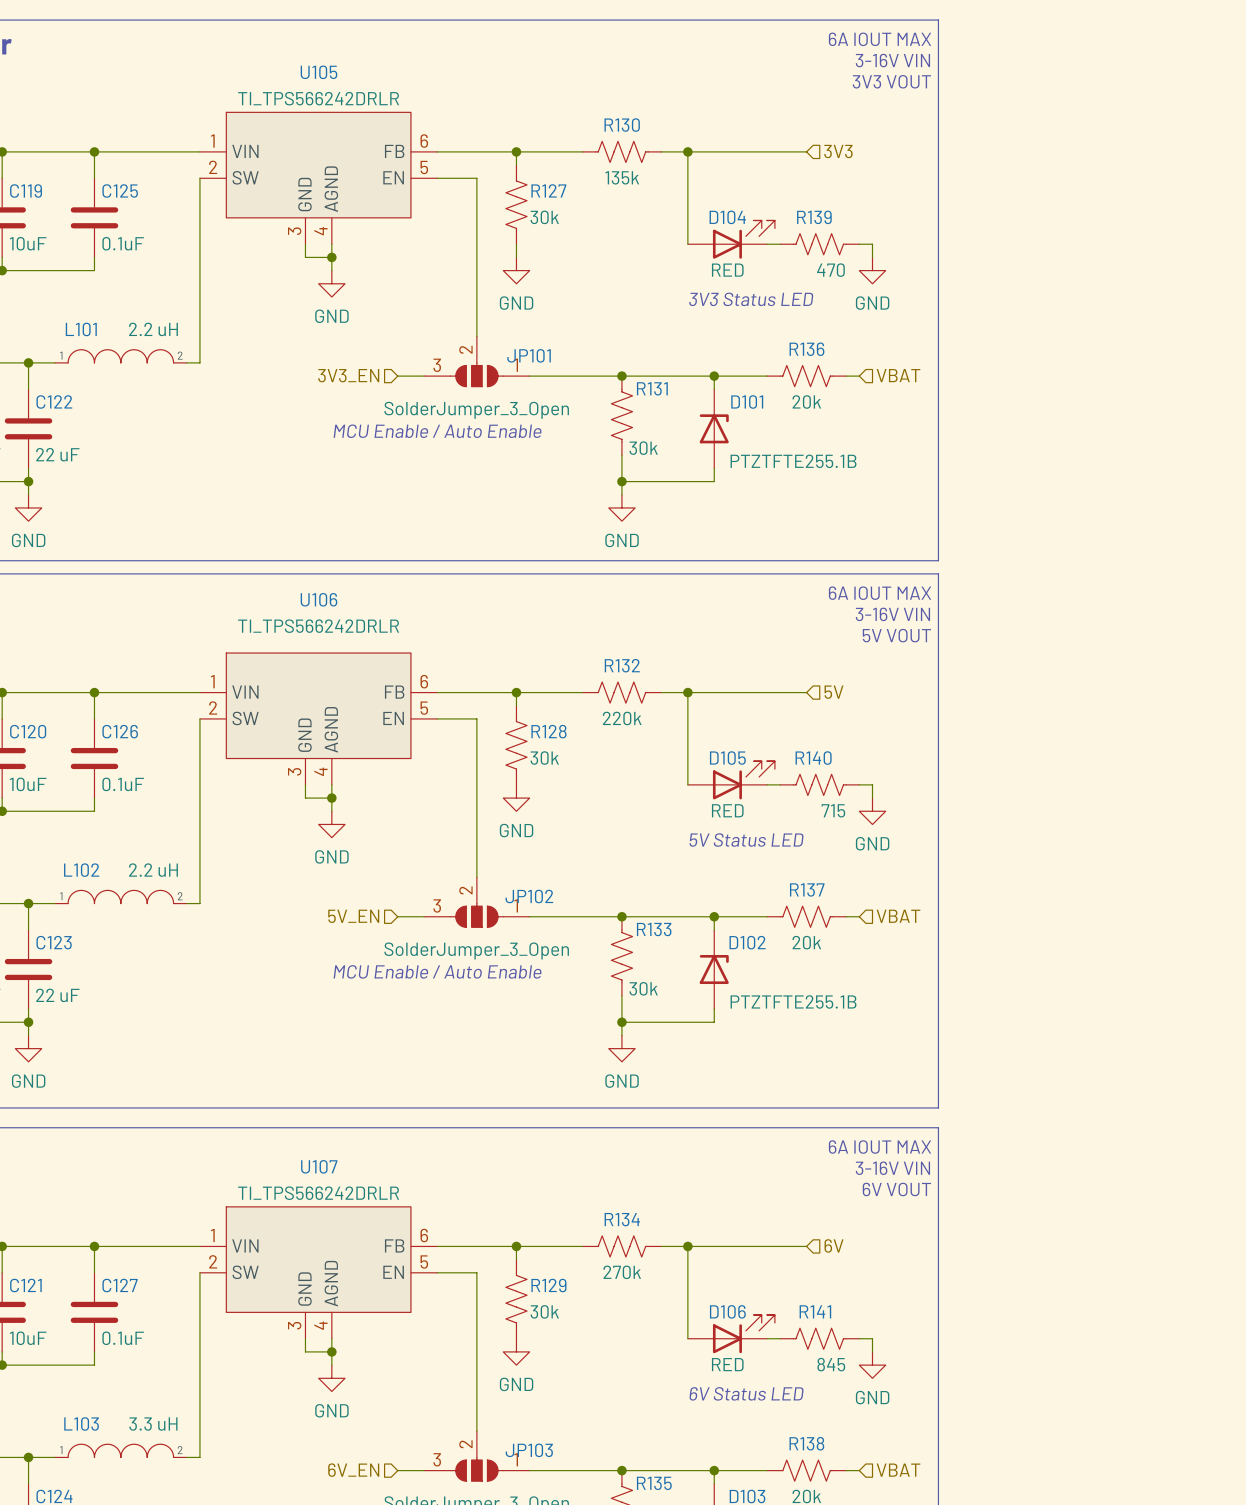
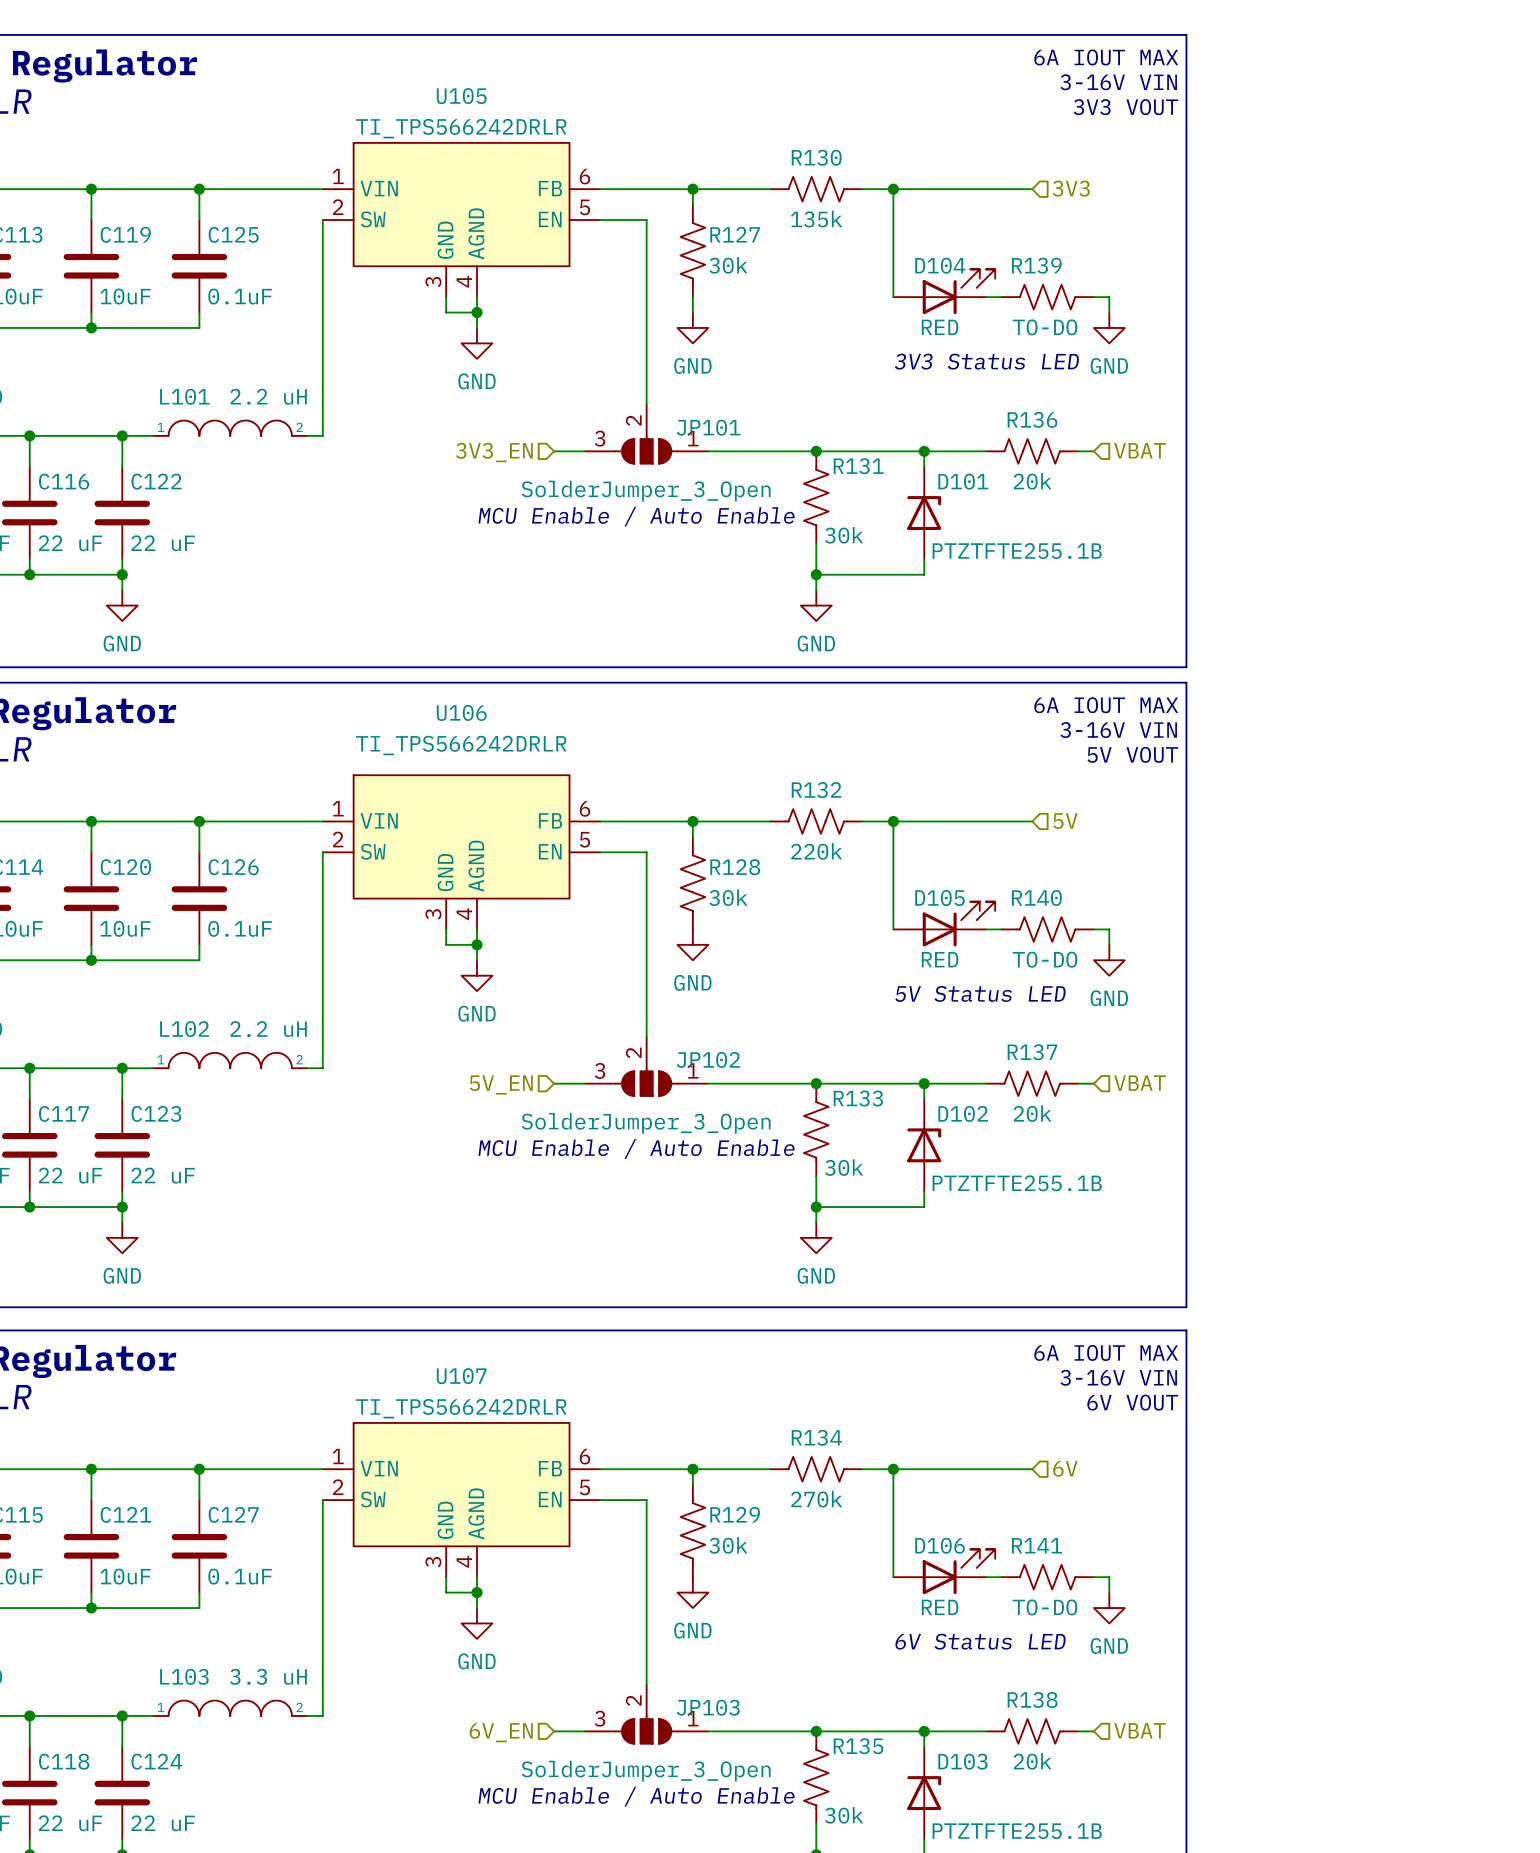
R139 value: 470 (830, 270) -> TO-DO (1044, 327)
R140 value: 715 (833, 810) -> TO-DO (1044, 959)
R141 value: 845 (831, 1364) -> TO-DO (1044, 1607)

